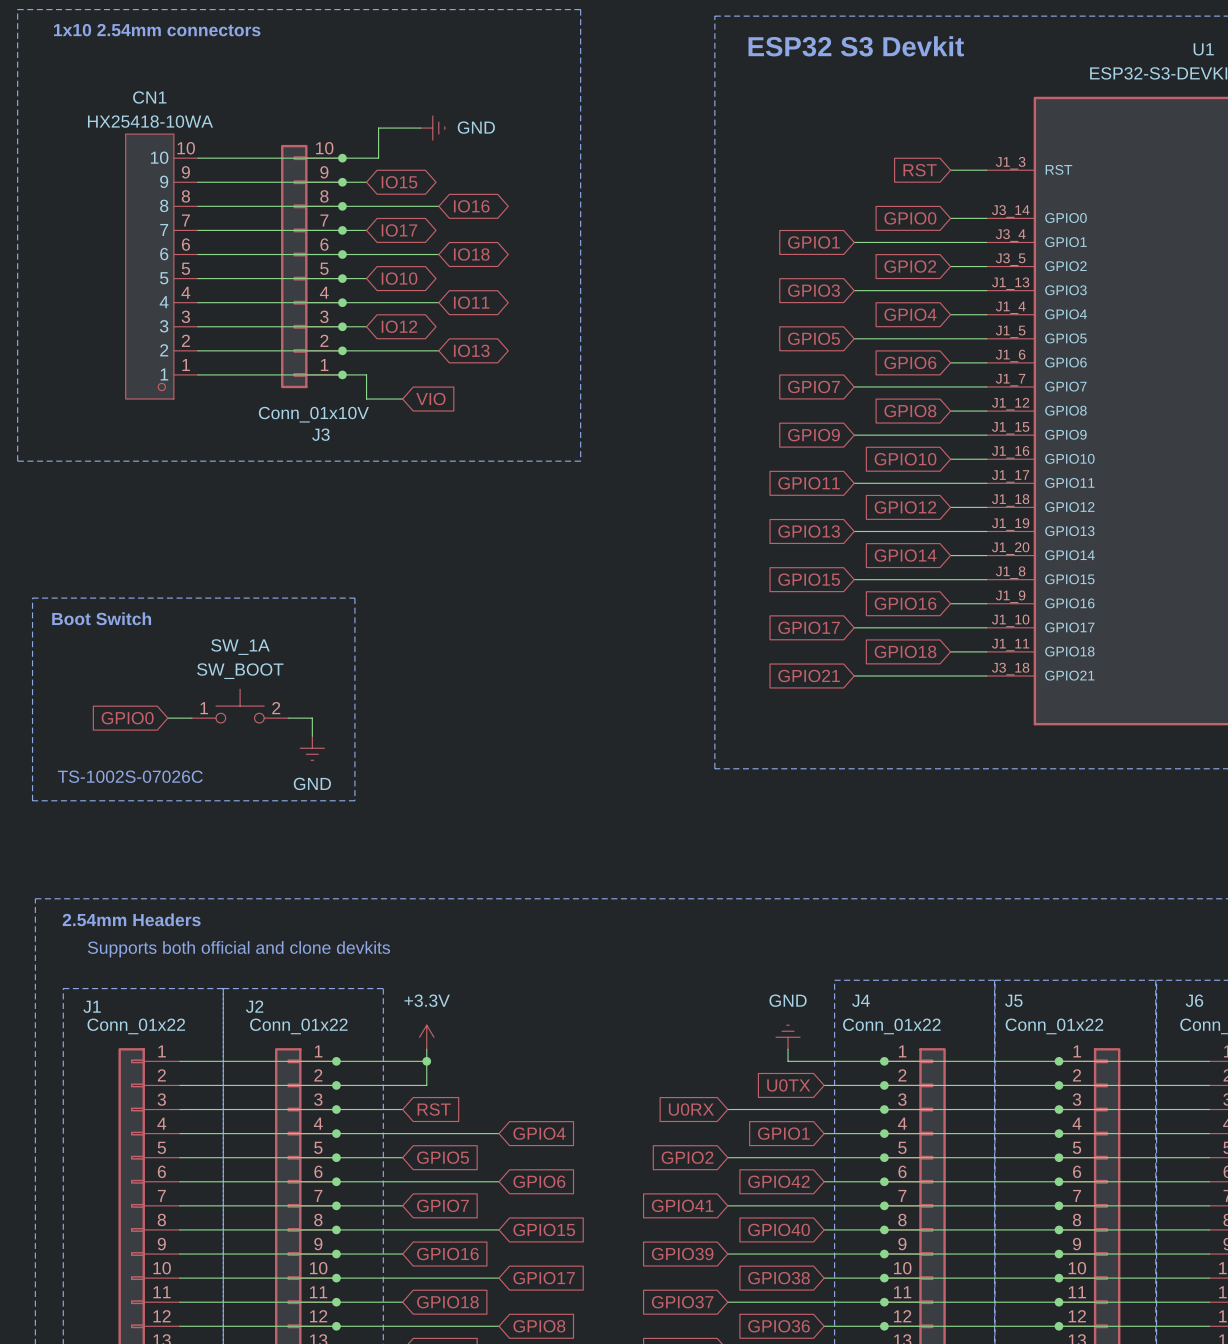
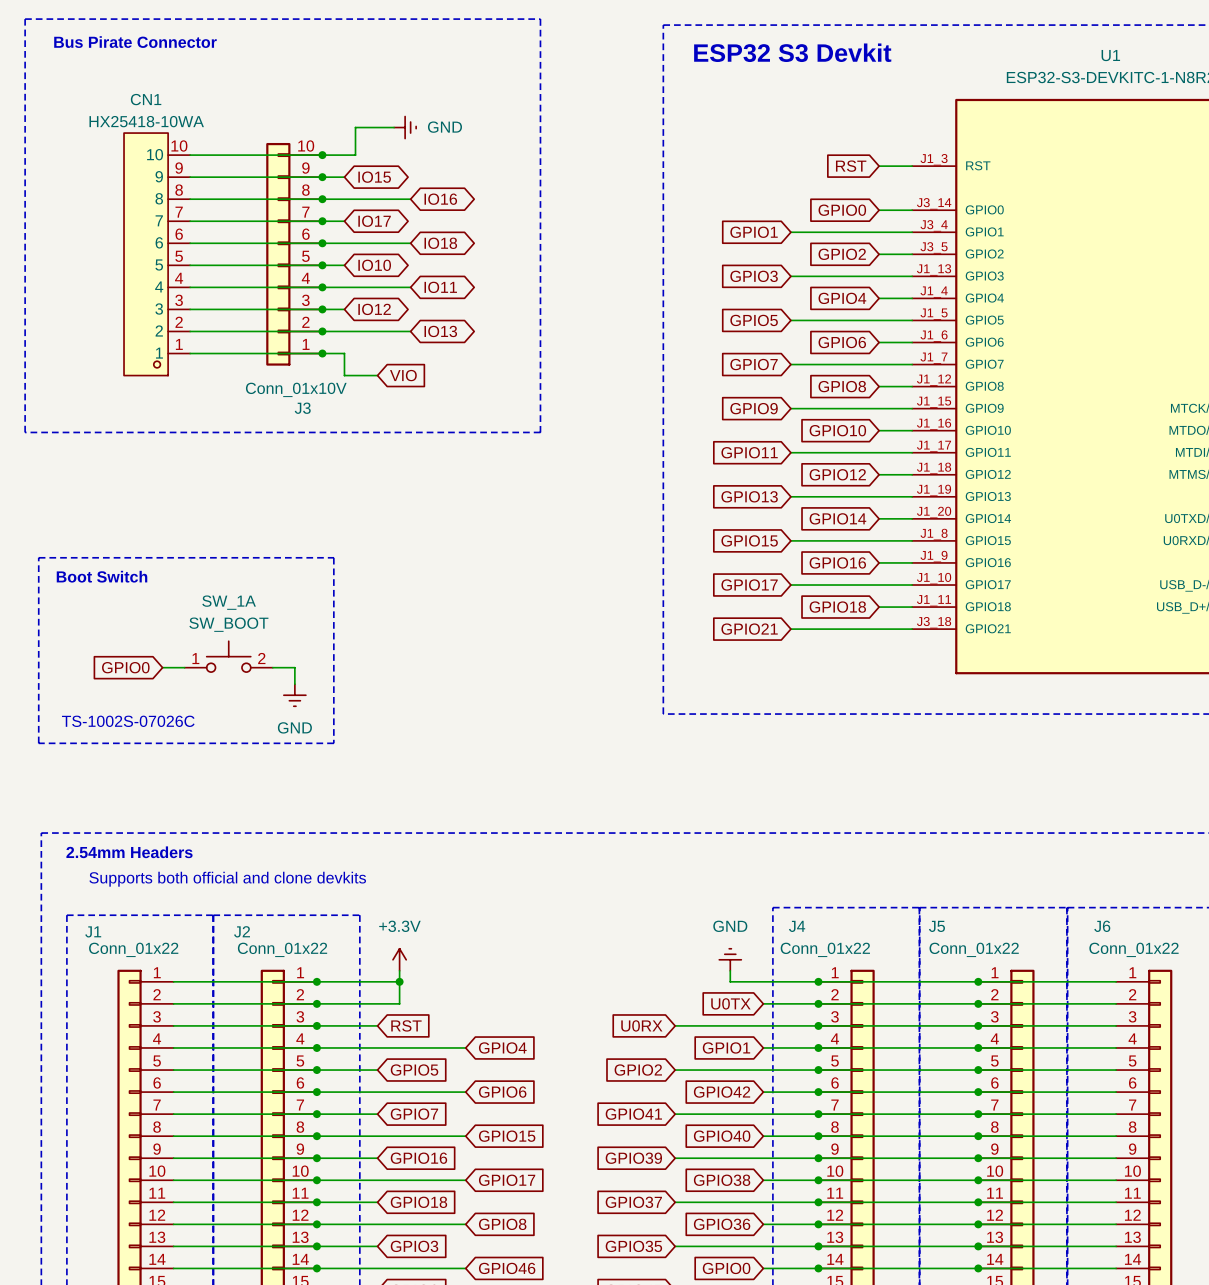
text: 1x10 2.54mm connectors (157, 30) -> none
text: none -> Bus Pirate Connector (135, 42)

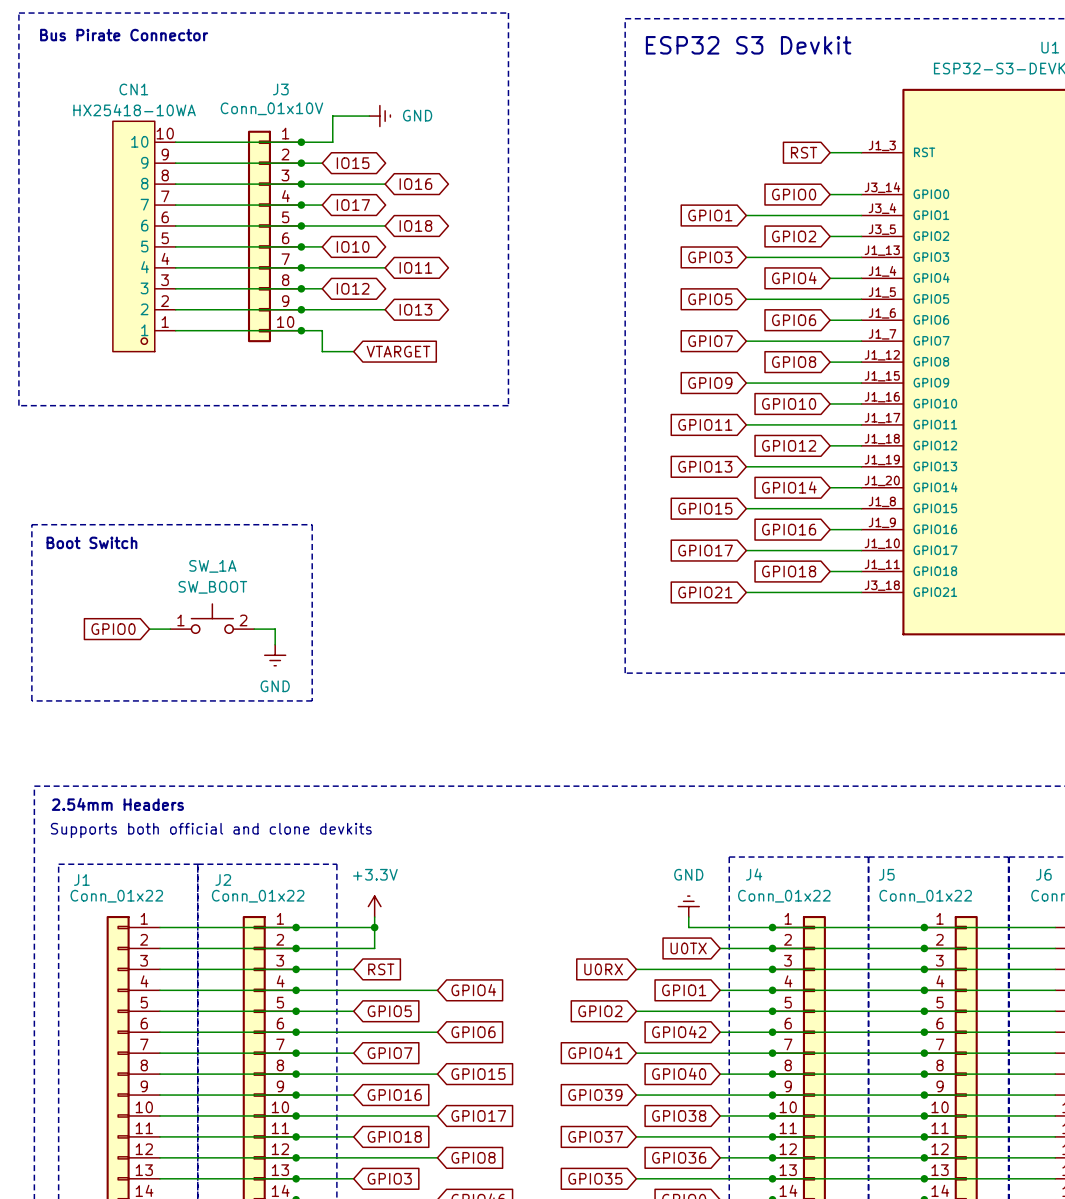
J3 flip: as is (278, 254) -> up-down (259, 236)
global label: VIO (403, 375) -> VTARGET (398, 351)
text: TS-1002S-07026C (128, 721) -> none

